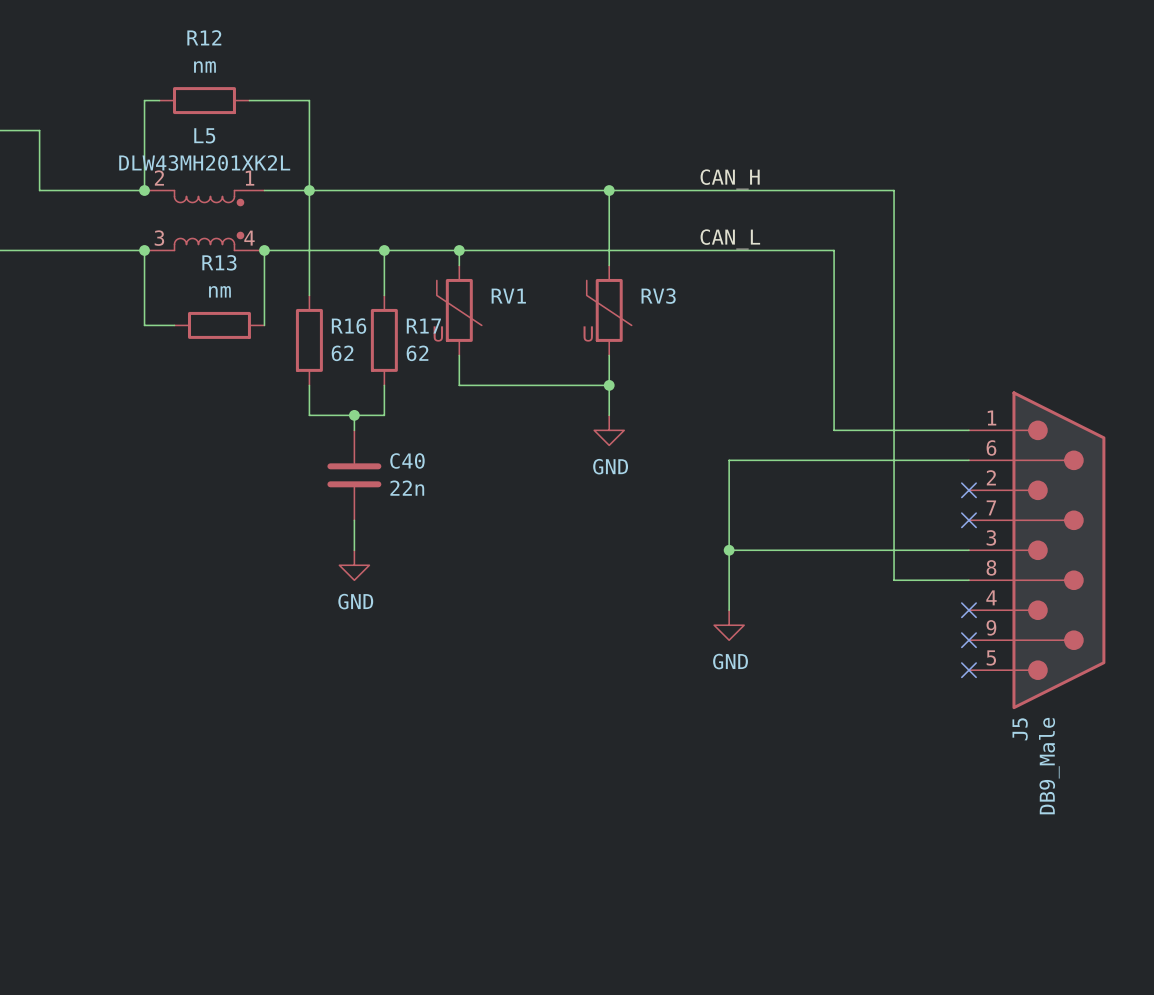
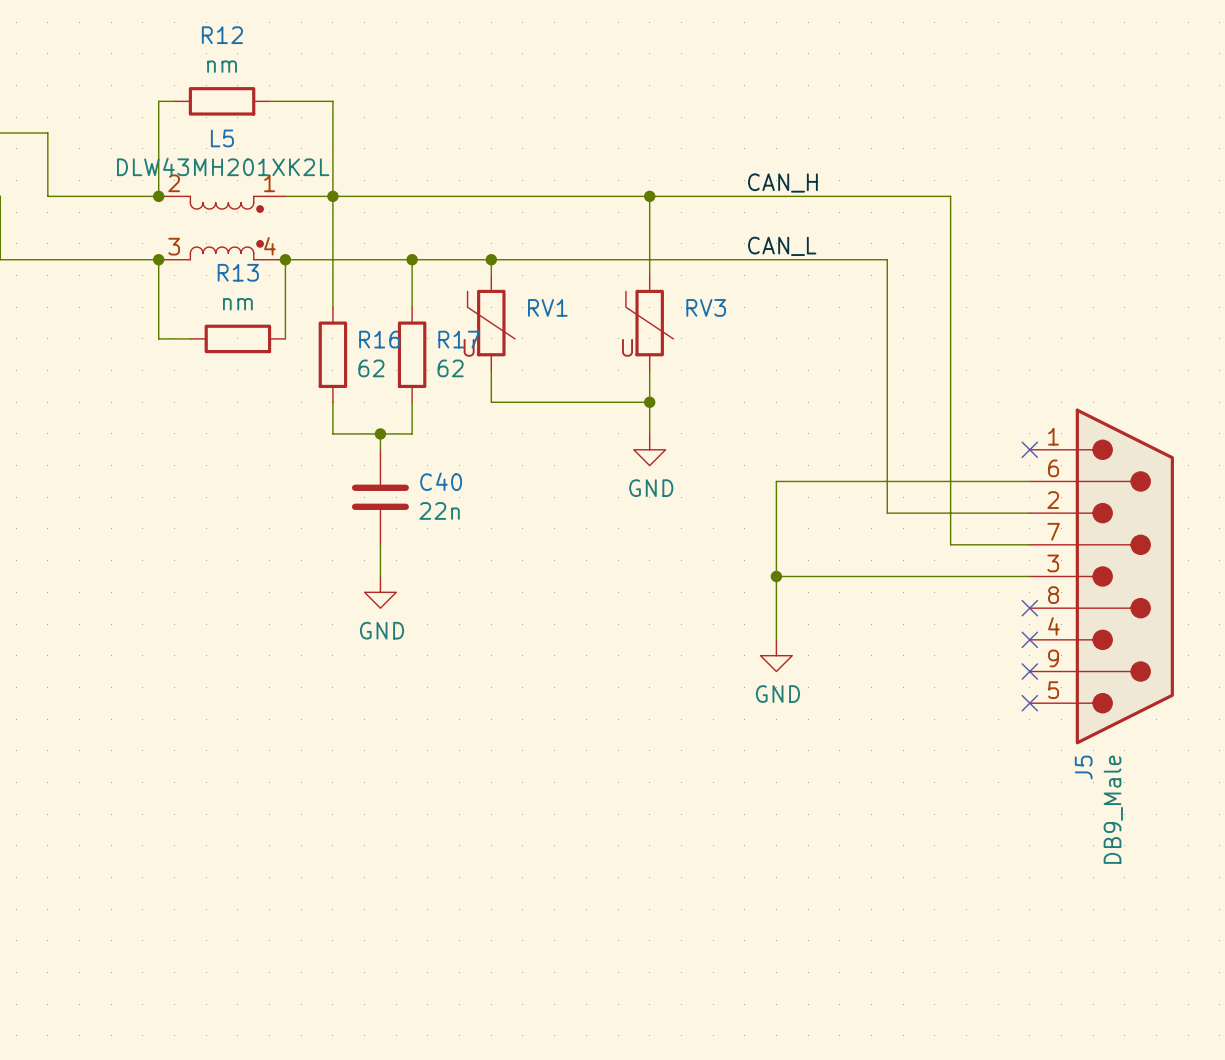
wire: (834, 430) (968, 430) -> (887, 449) (887, 513) (1029, 513)
no-connect mark: none -> (1029, 449)
no-connect mark: (968, 490) -> none
wire: (894, 520) (894, 580) (968, 580) -> (950, 544) (1029, 544)
no-connect mark: (968, 520) -> none
no-connect mark: none -> (1029, 608)

